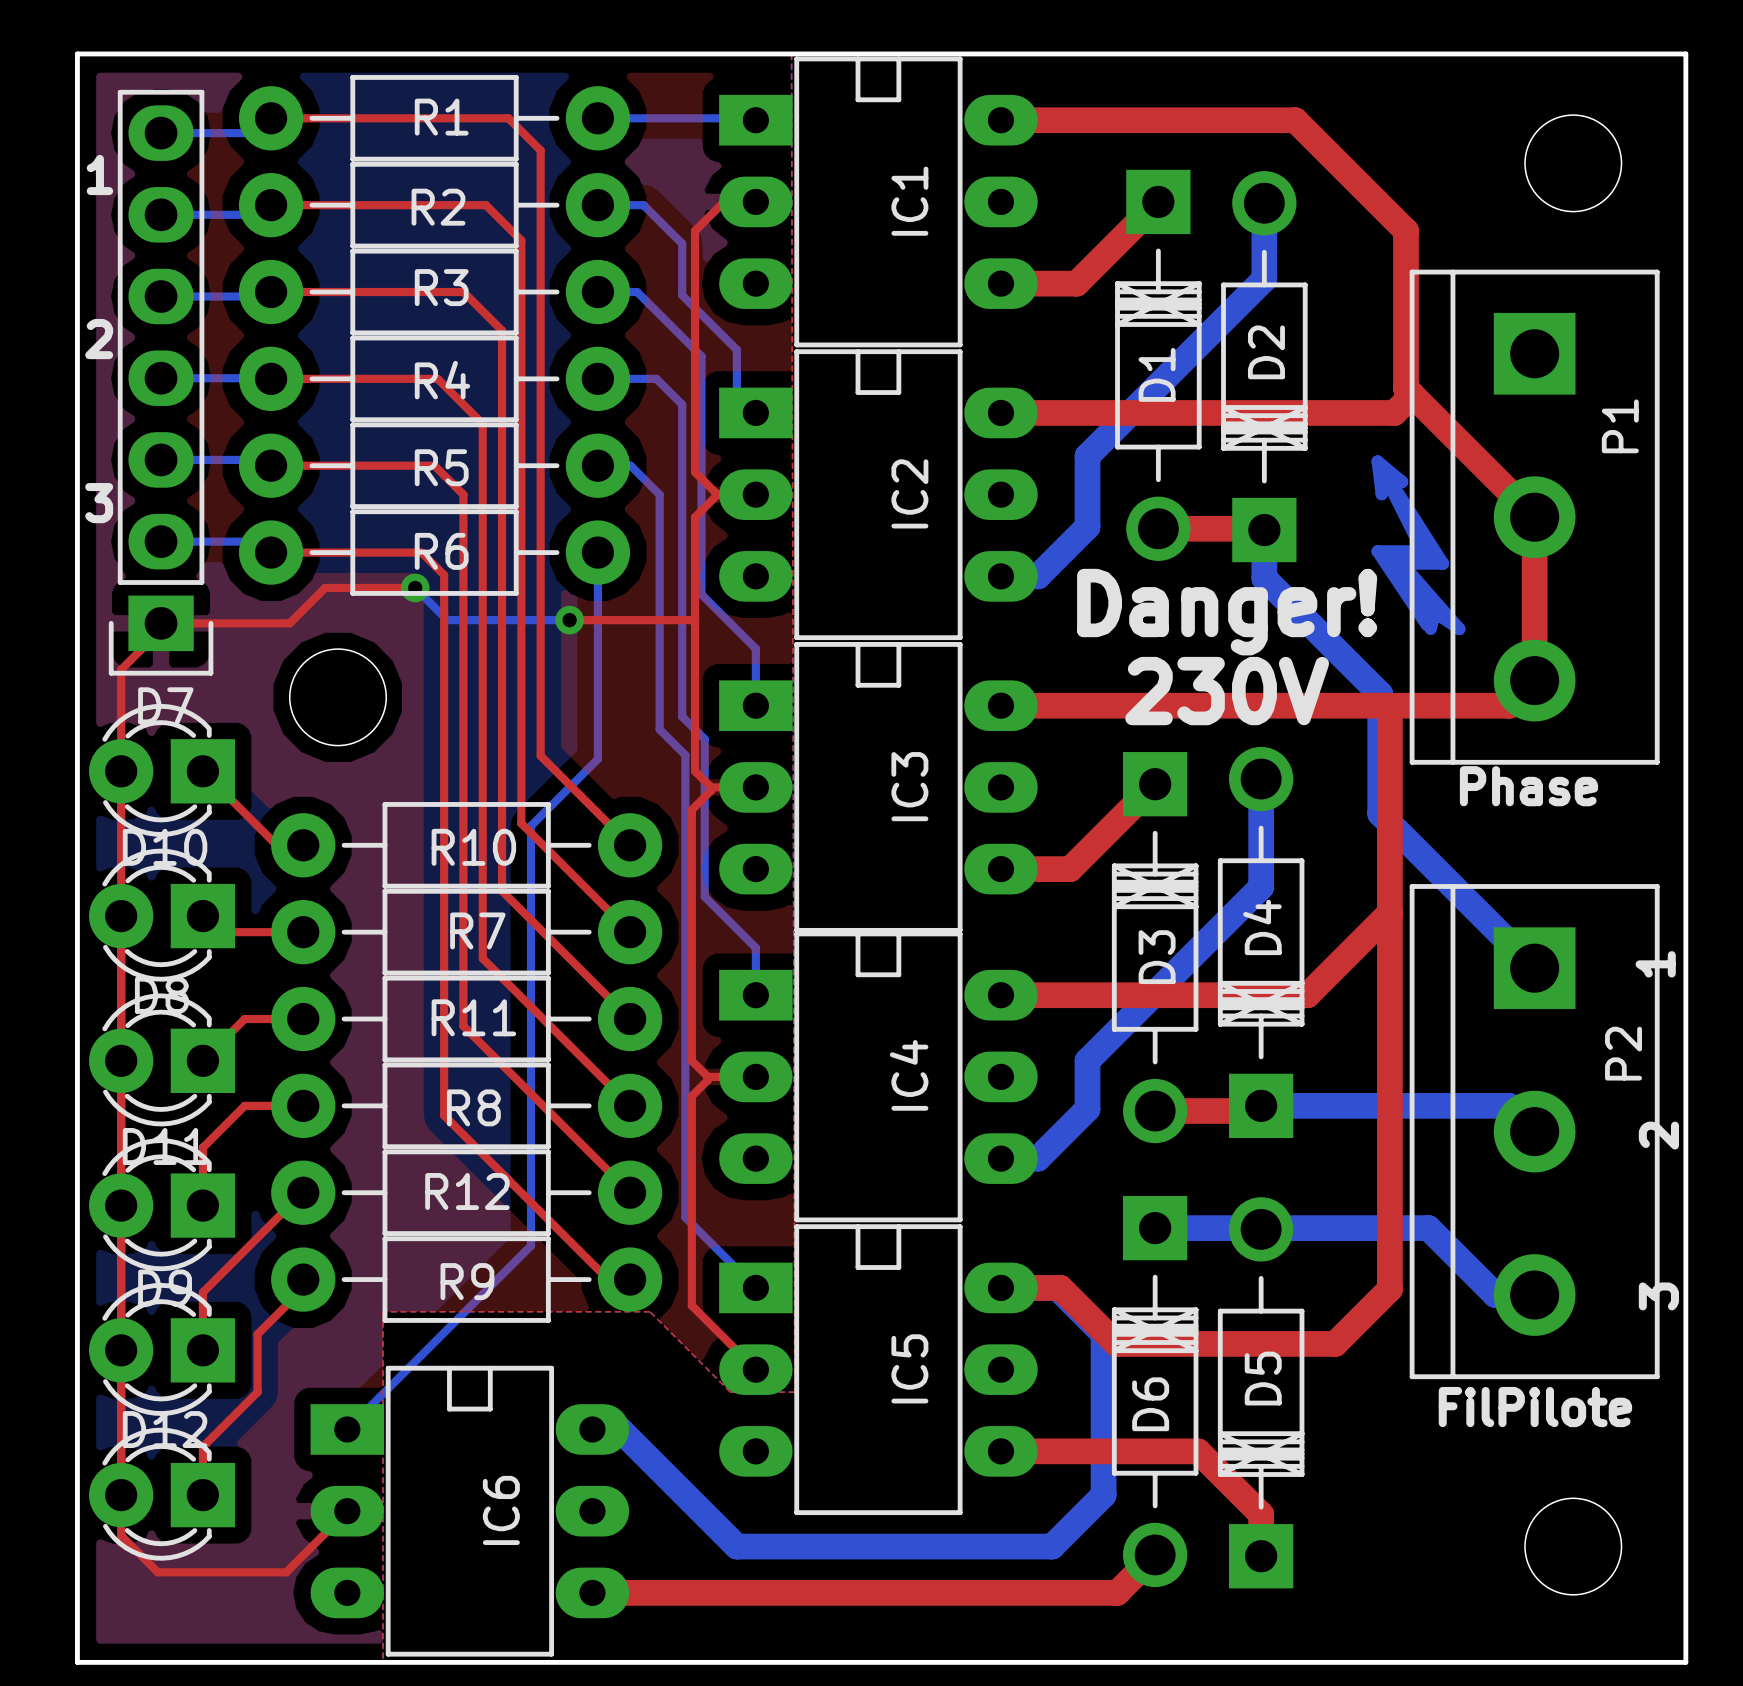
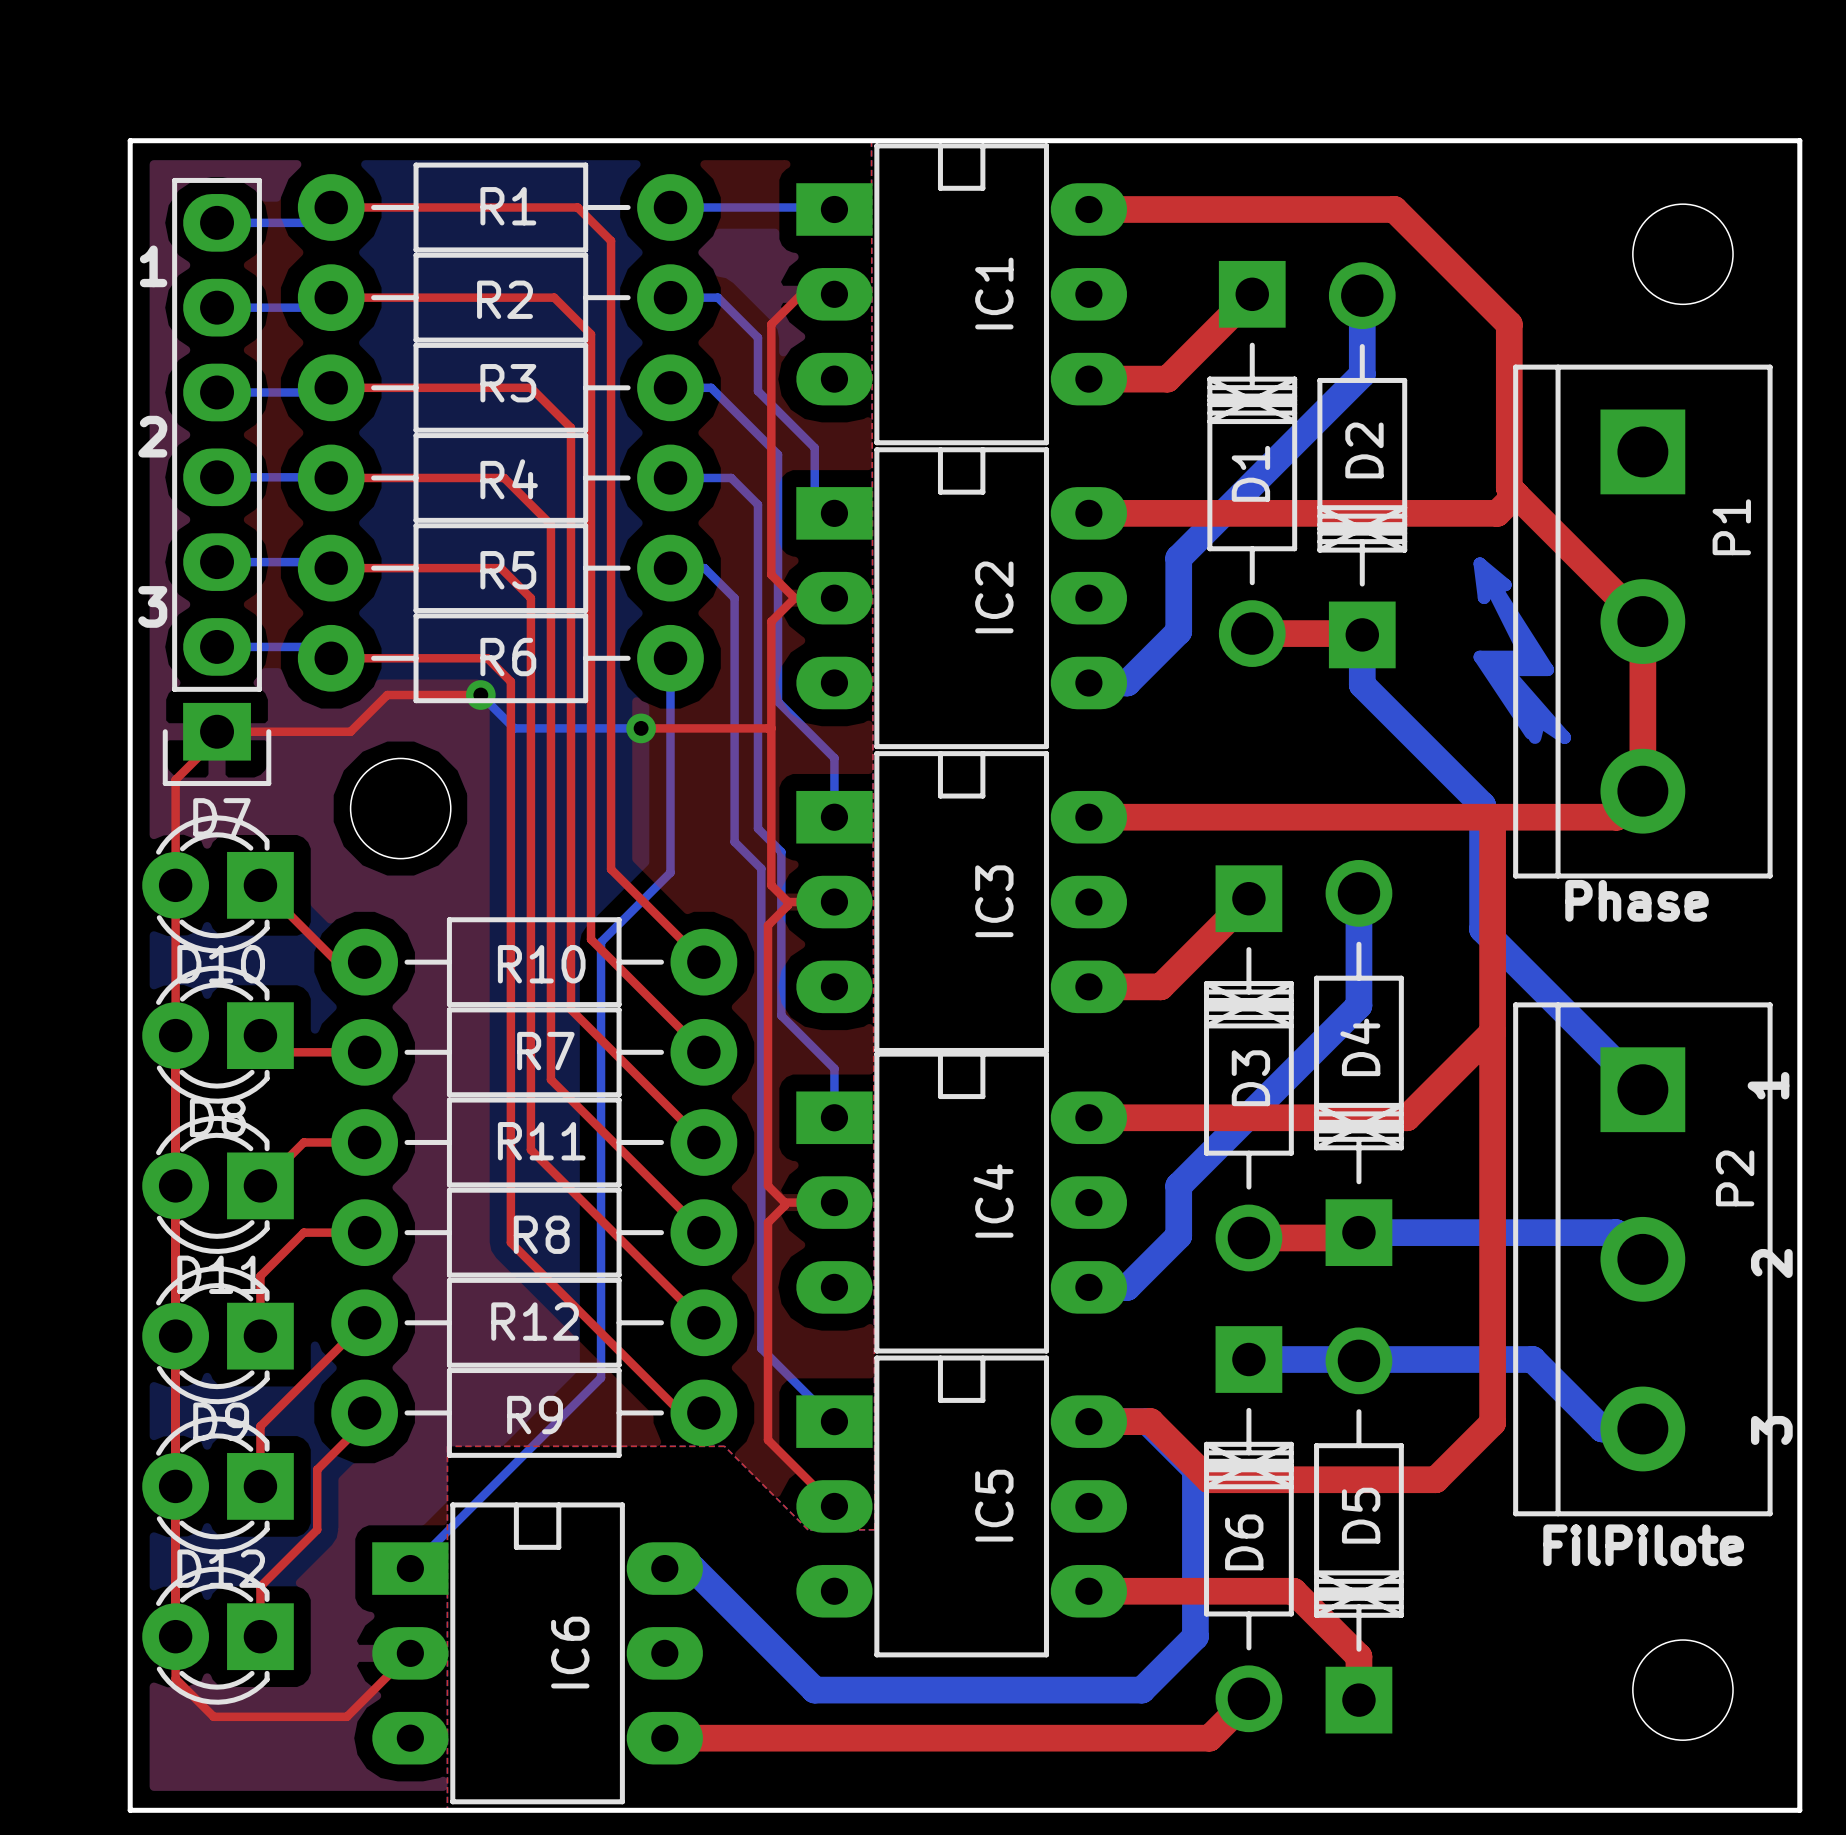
text: Danger! (1227, 612) -> none
text: 230V (1227, 691) -> none

